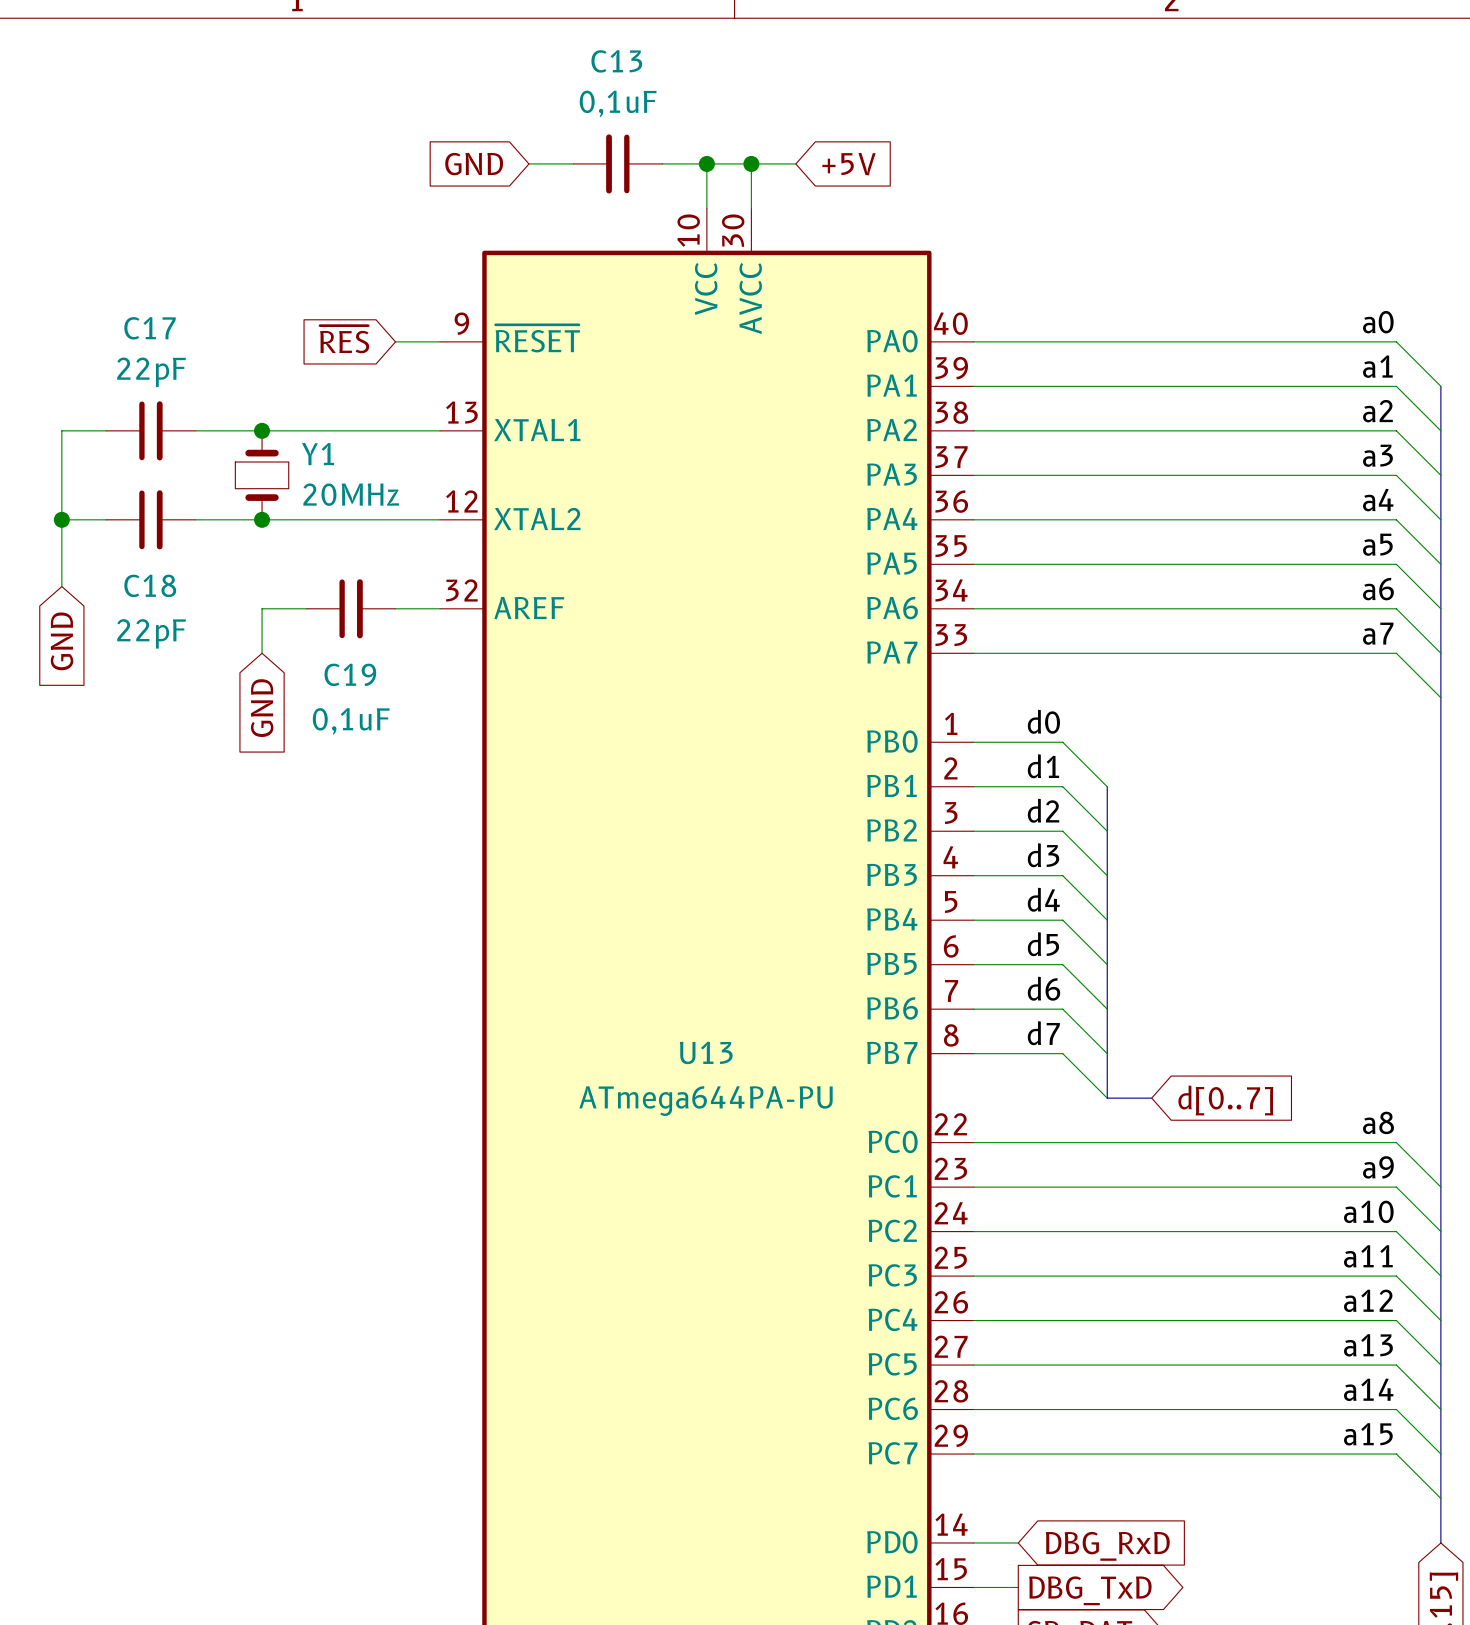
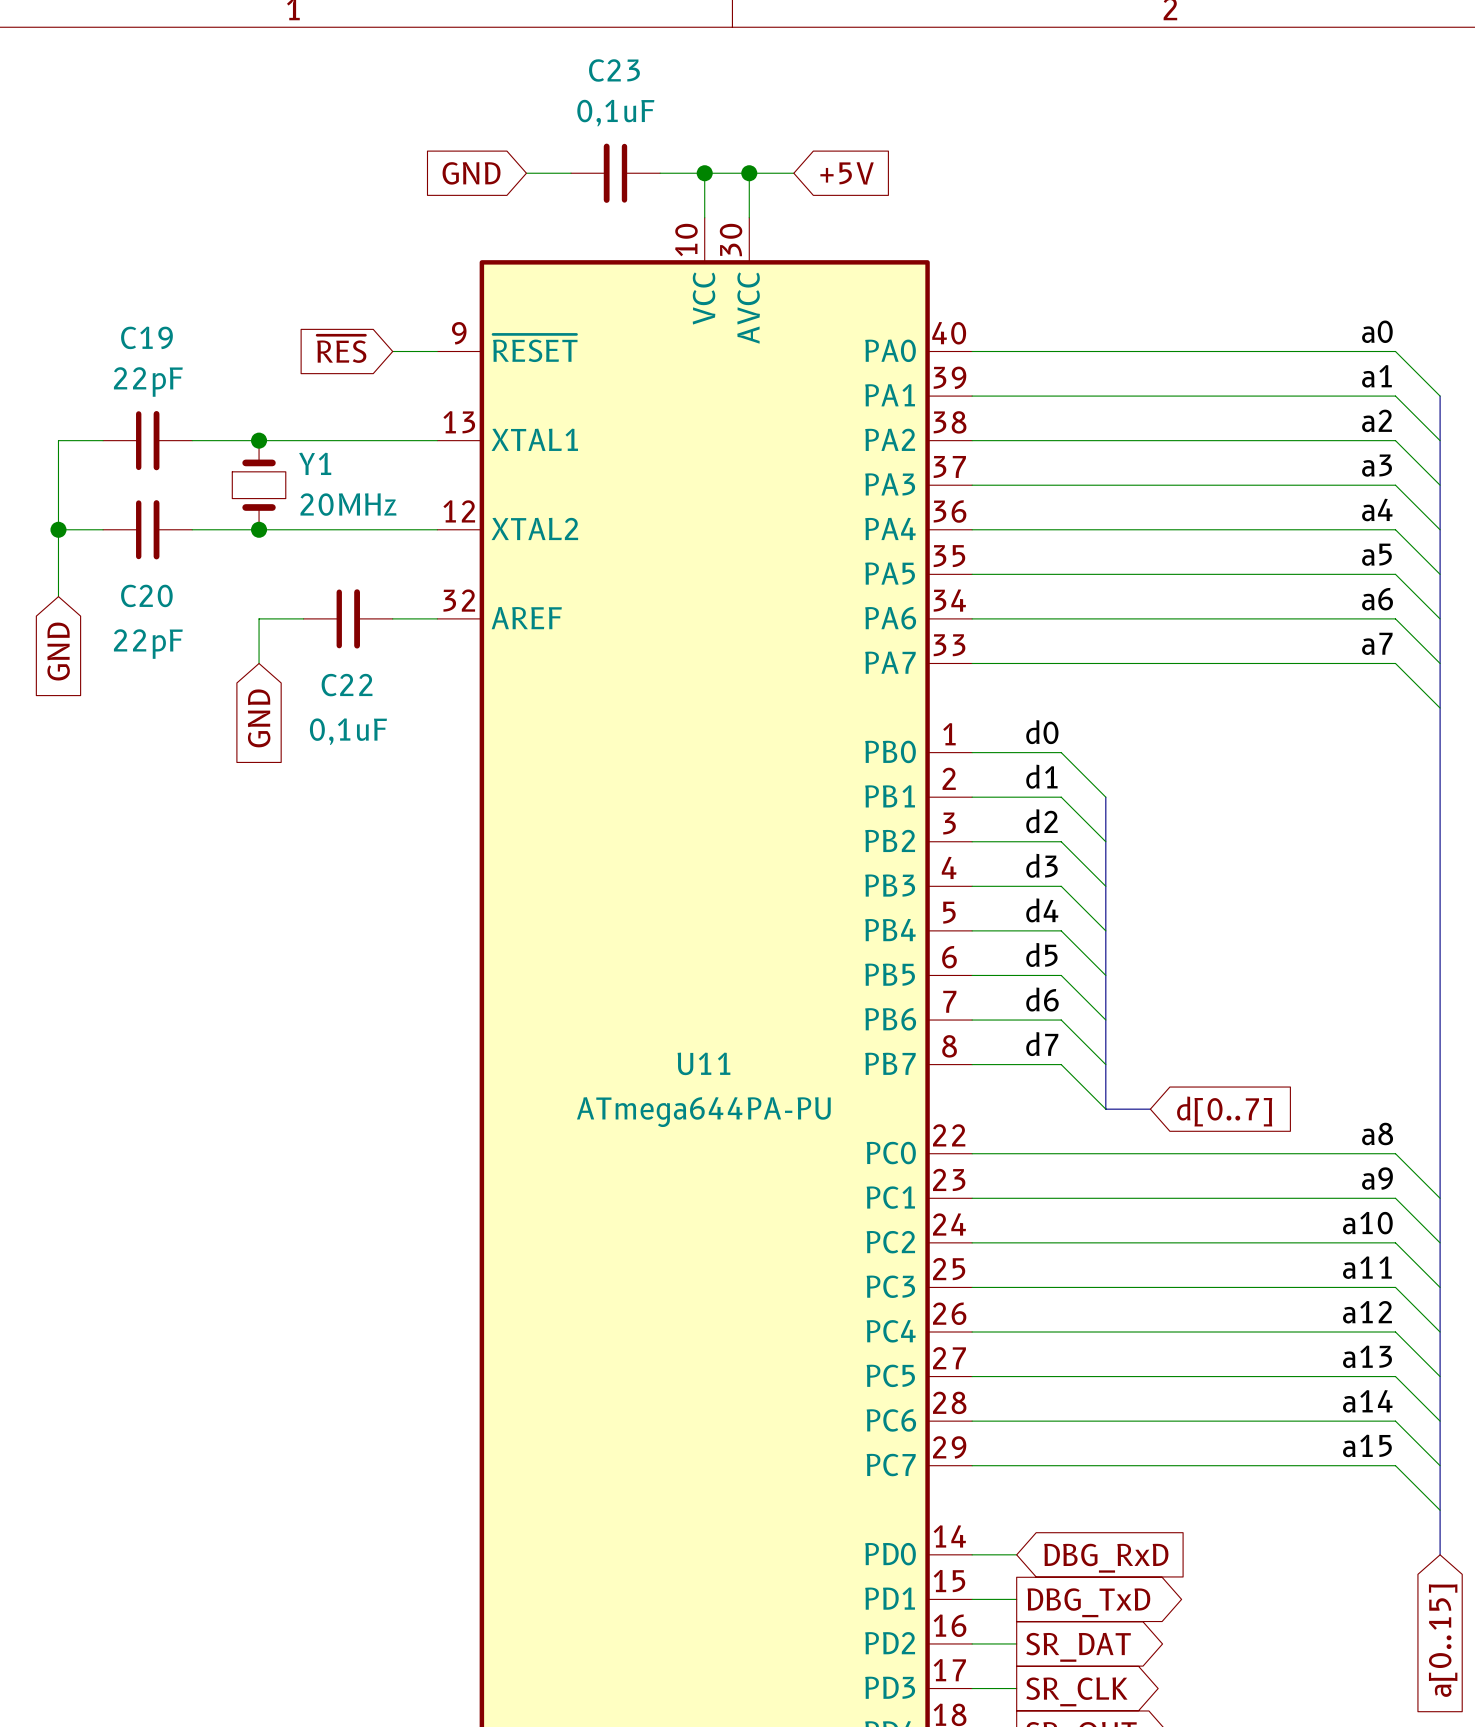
C13 name: C13 (616, 61) -> C23 (614, 70)
C17 name: C17 (150, 328) -> C19 (146, 337)
C18 name: C18 (150, 585) -> C20 (146, 595)
C19 name: C19 (350, 674) -> C22 (347, 685)
U13 name: U13 (706, 1052) -> U11 (703, 1063)

